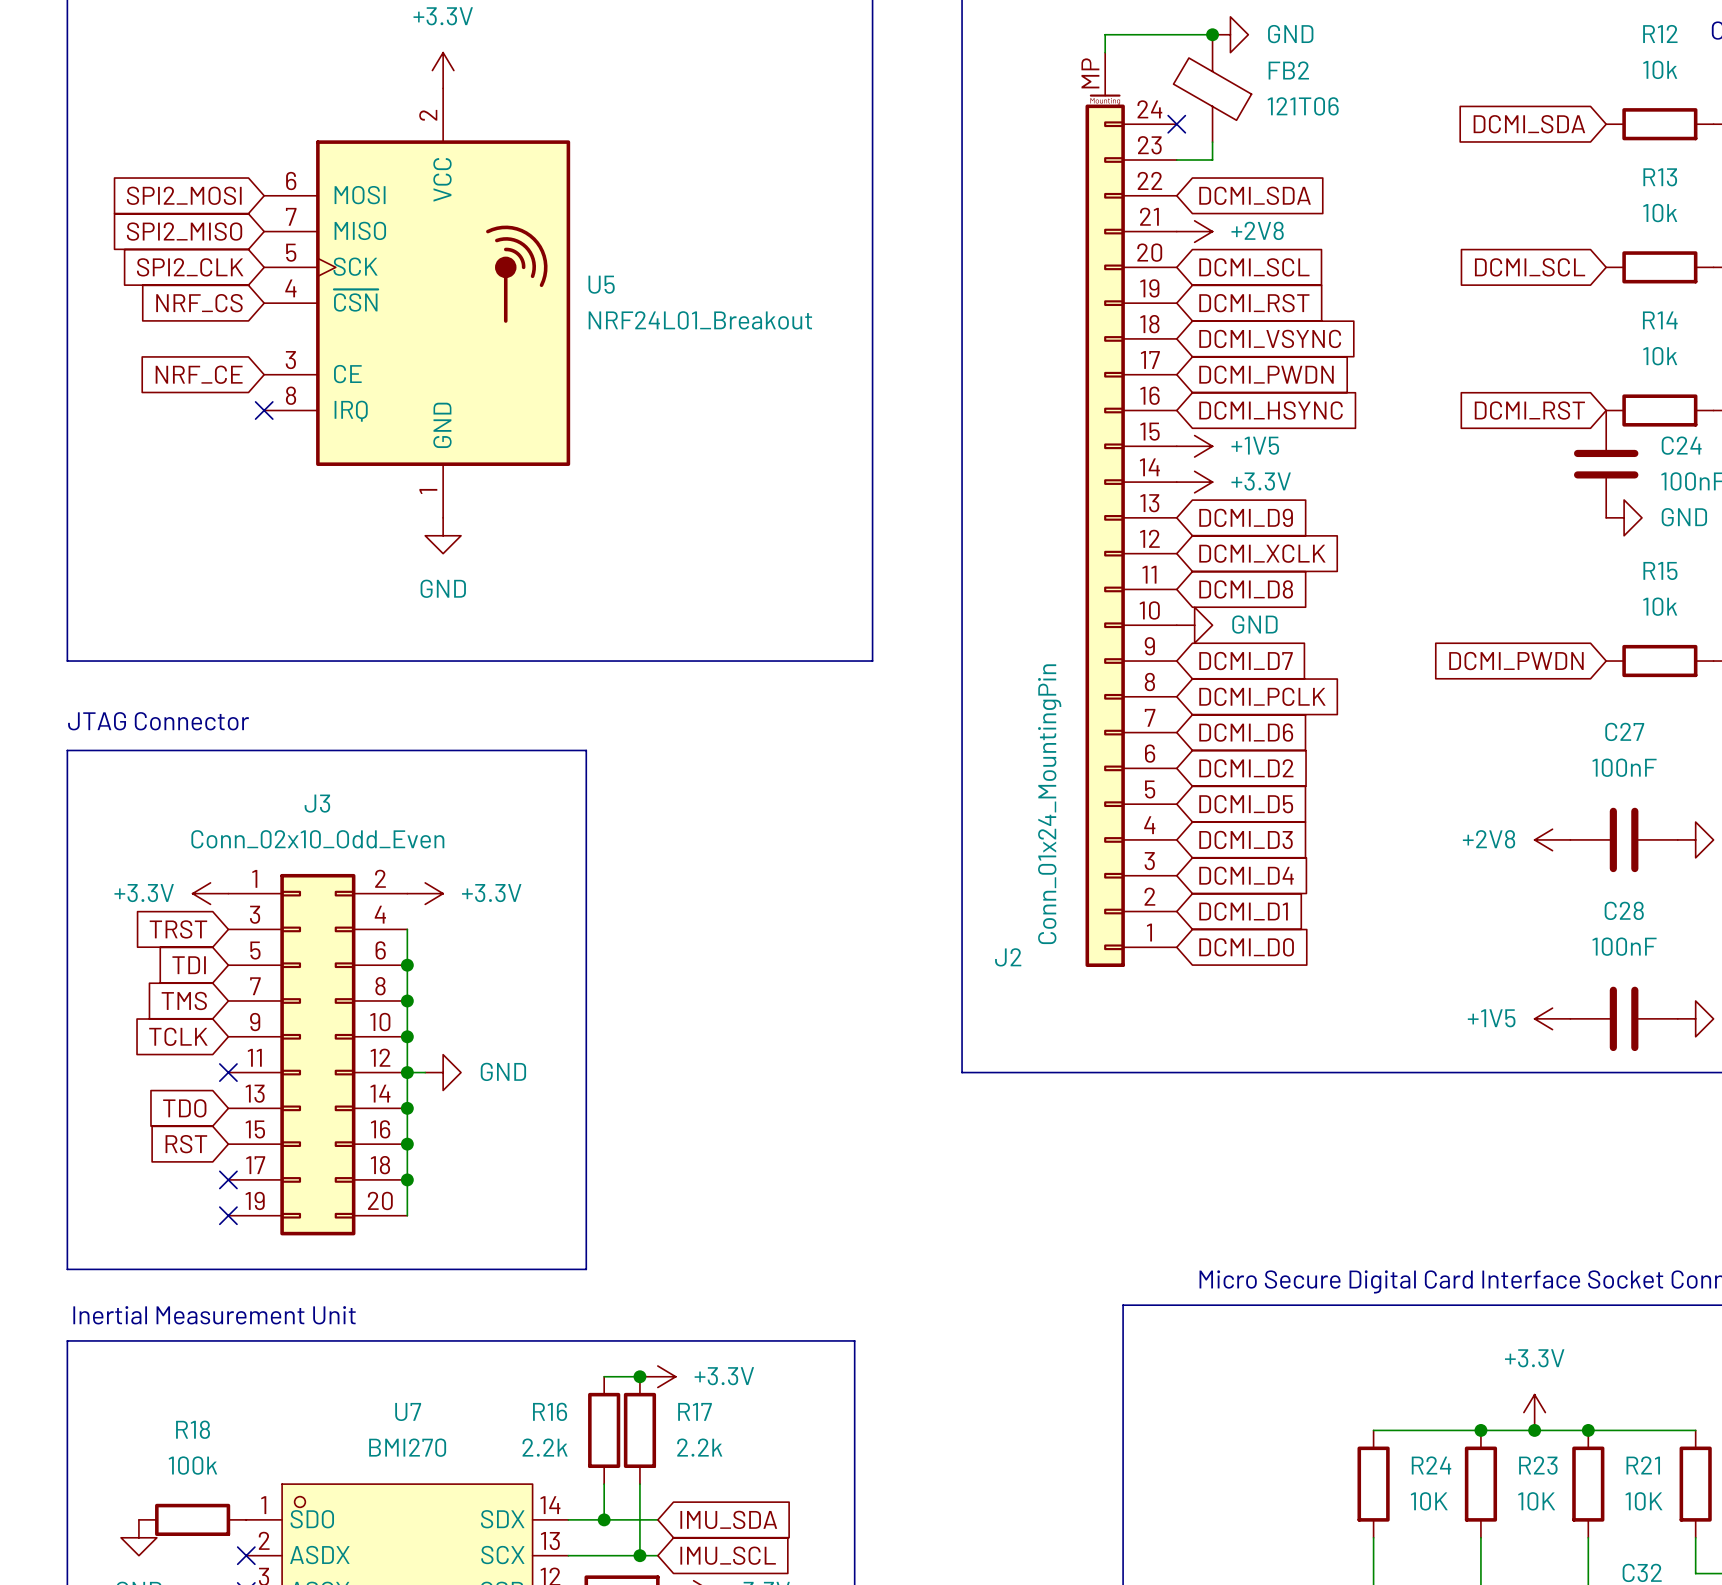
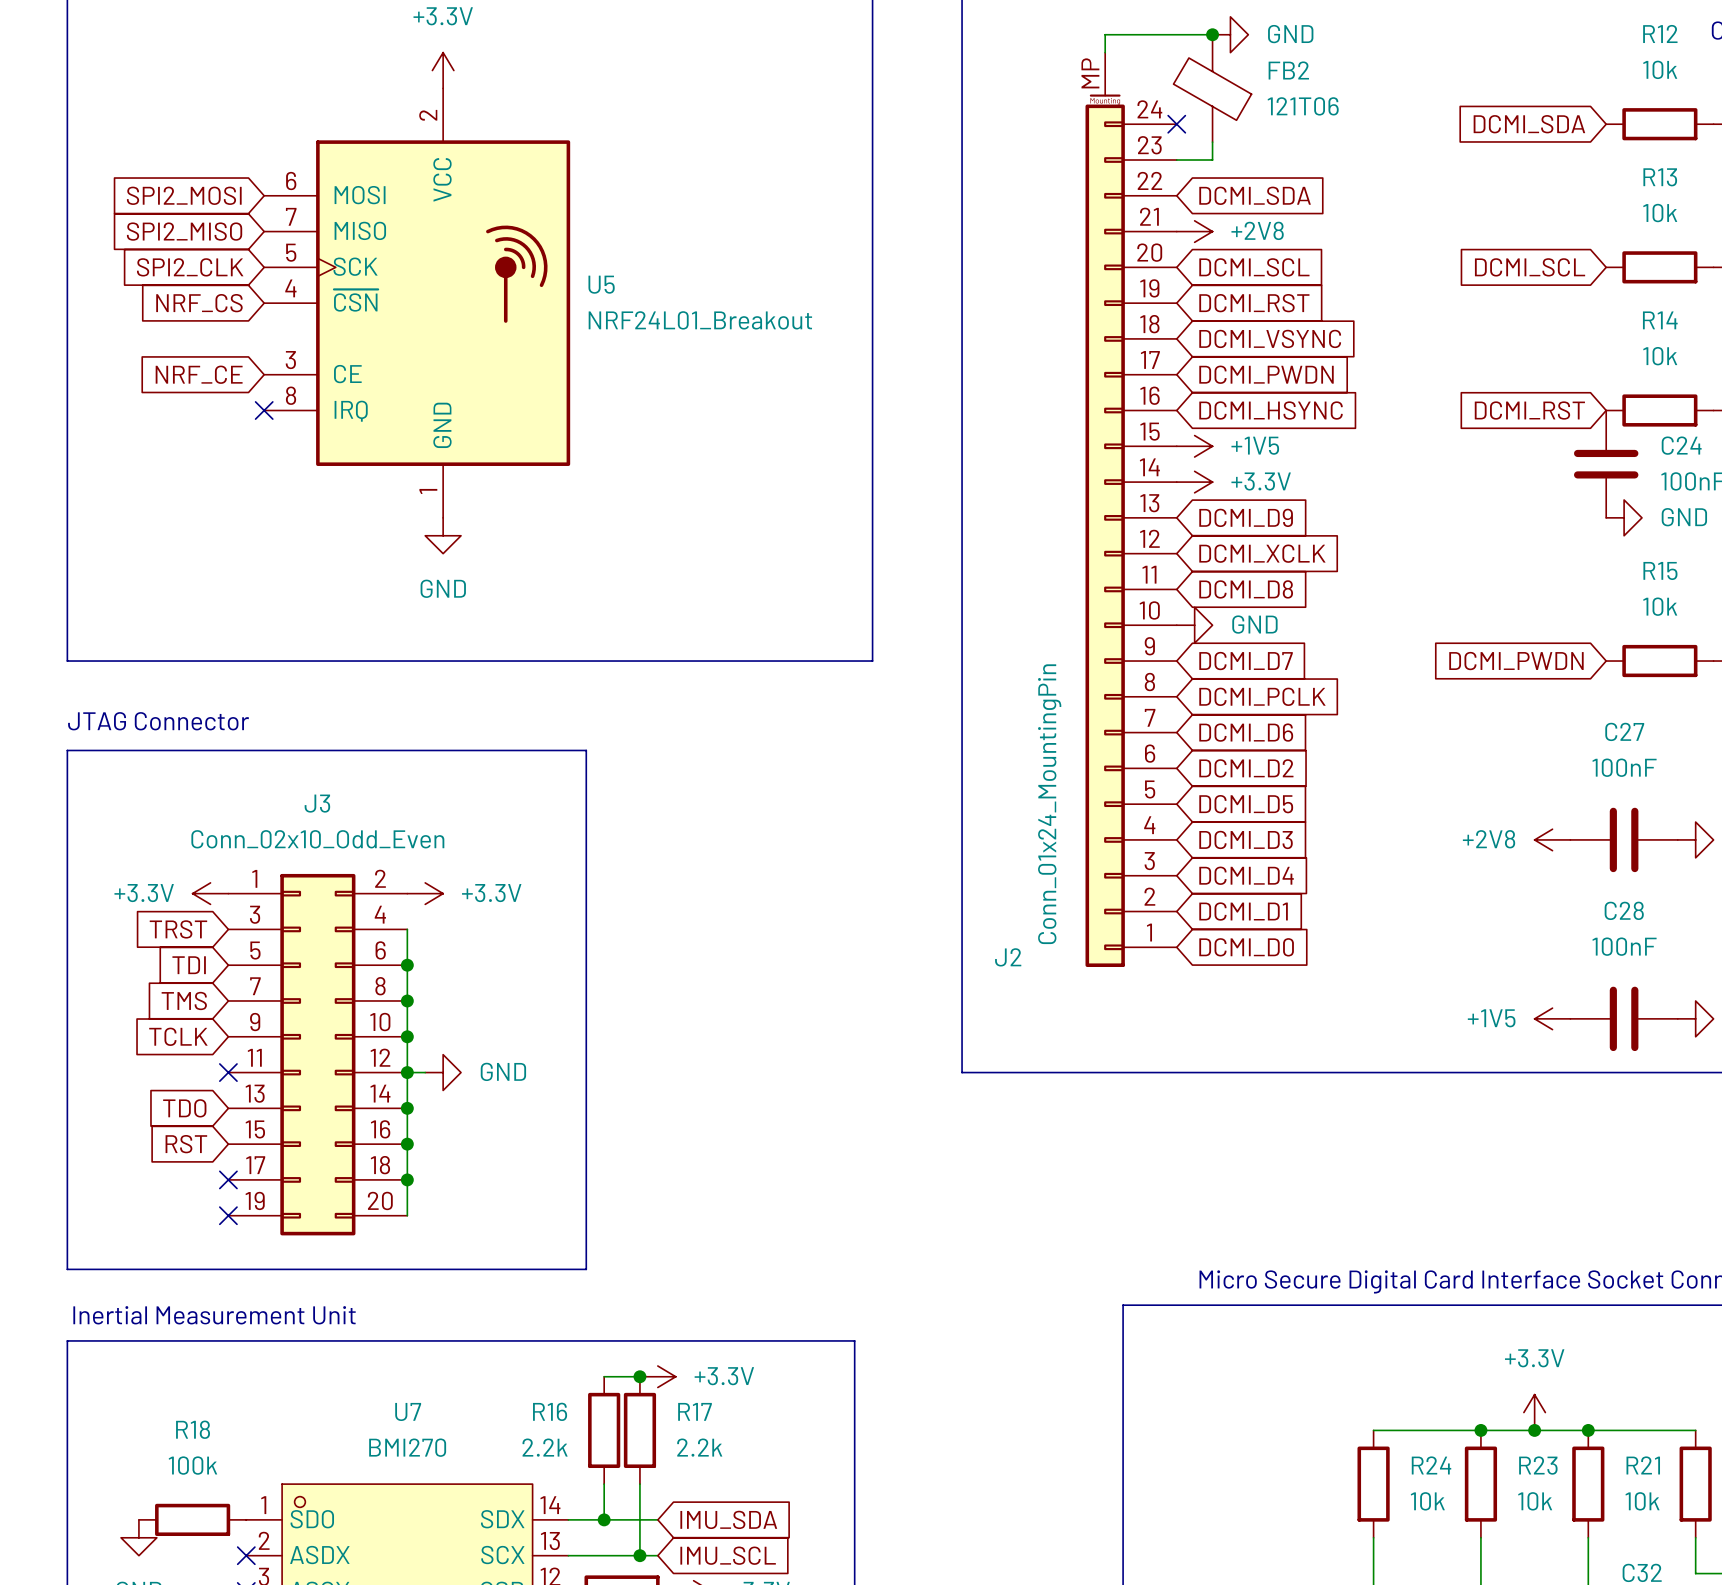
R24 value: 10K (1429, 1501) -> 10k (1427, 1501)
R23 value: 10K (1536, 1501) -> 10k (1535, 1501)
R21 value: 10K (1643, 1501) -> 10k (1642, 1501)

